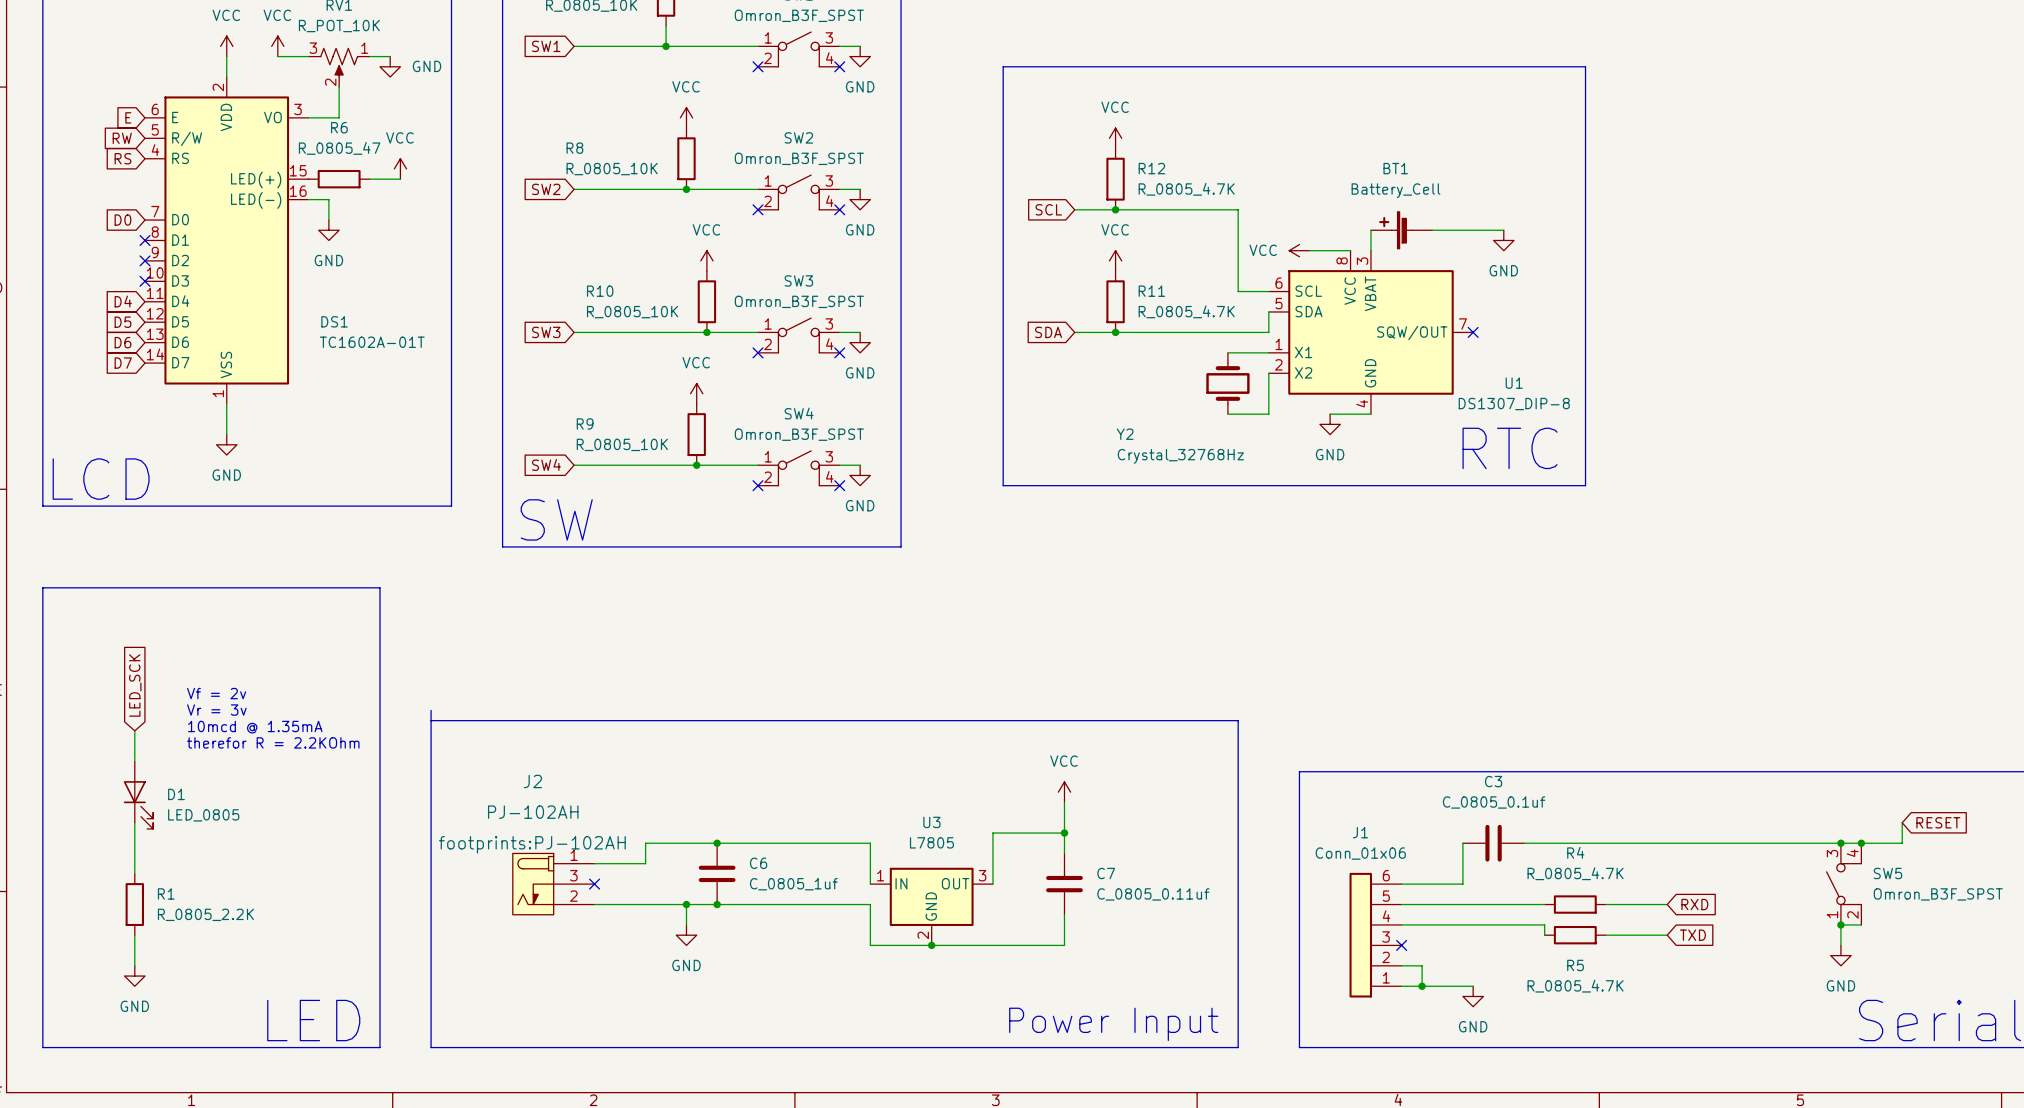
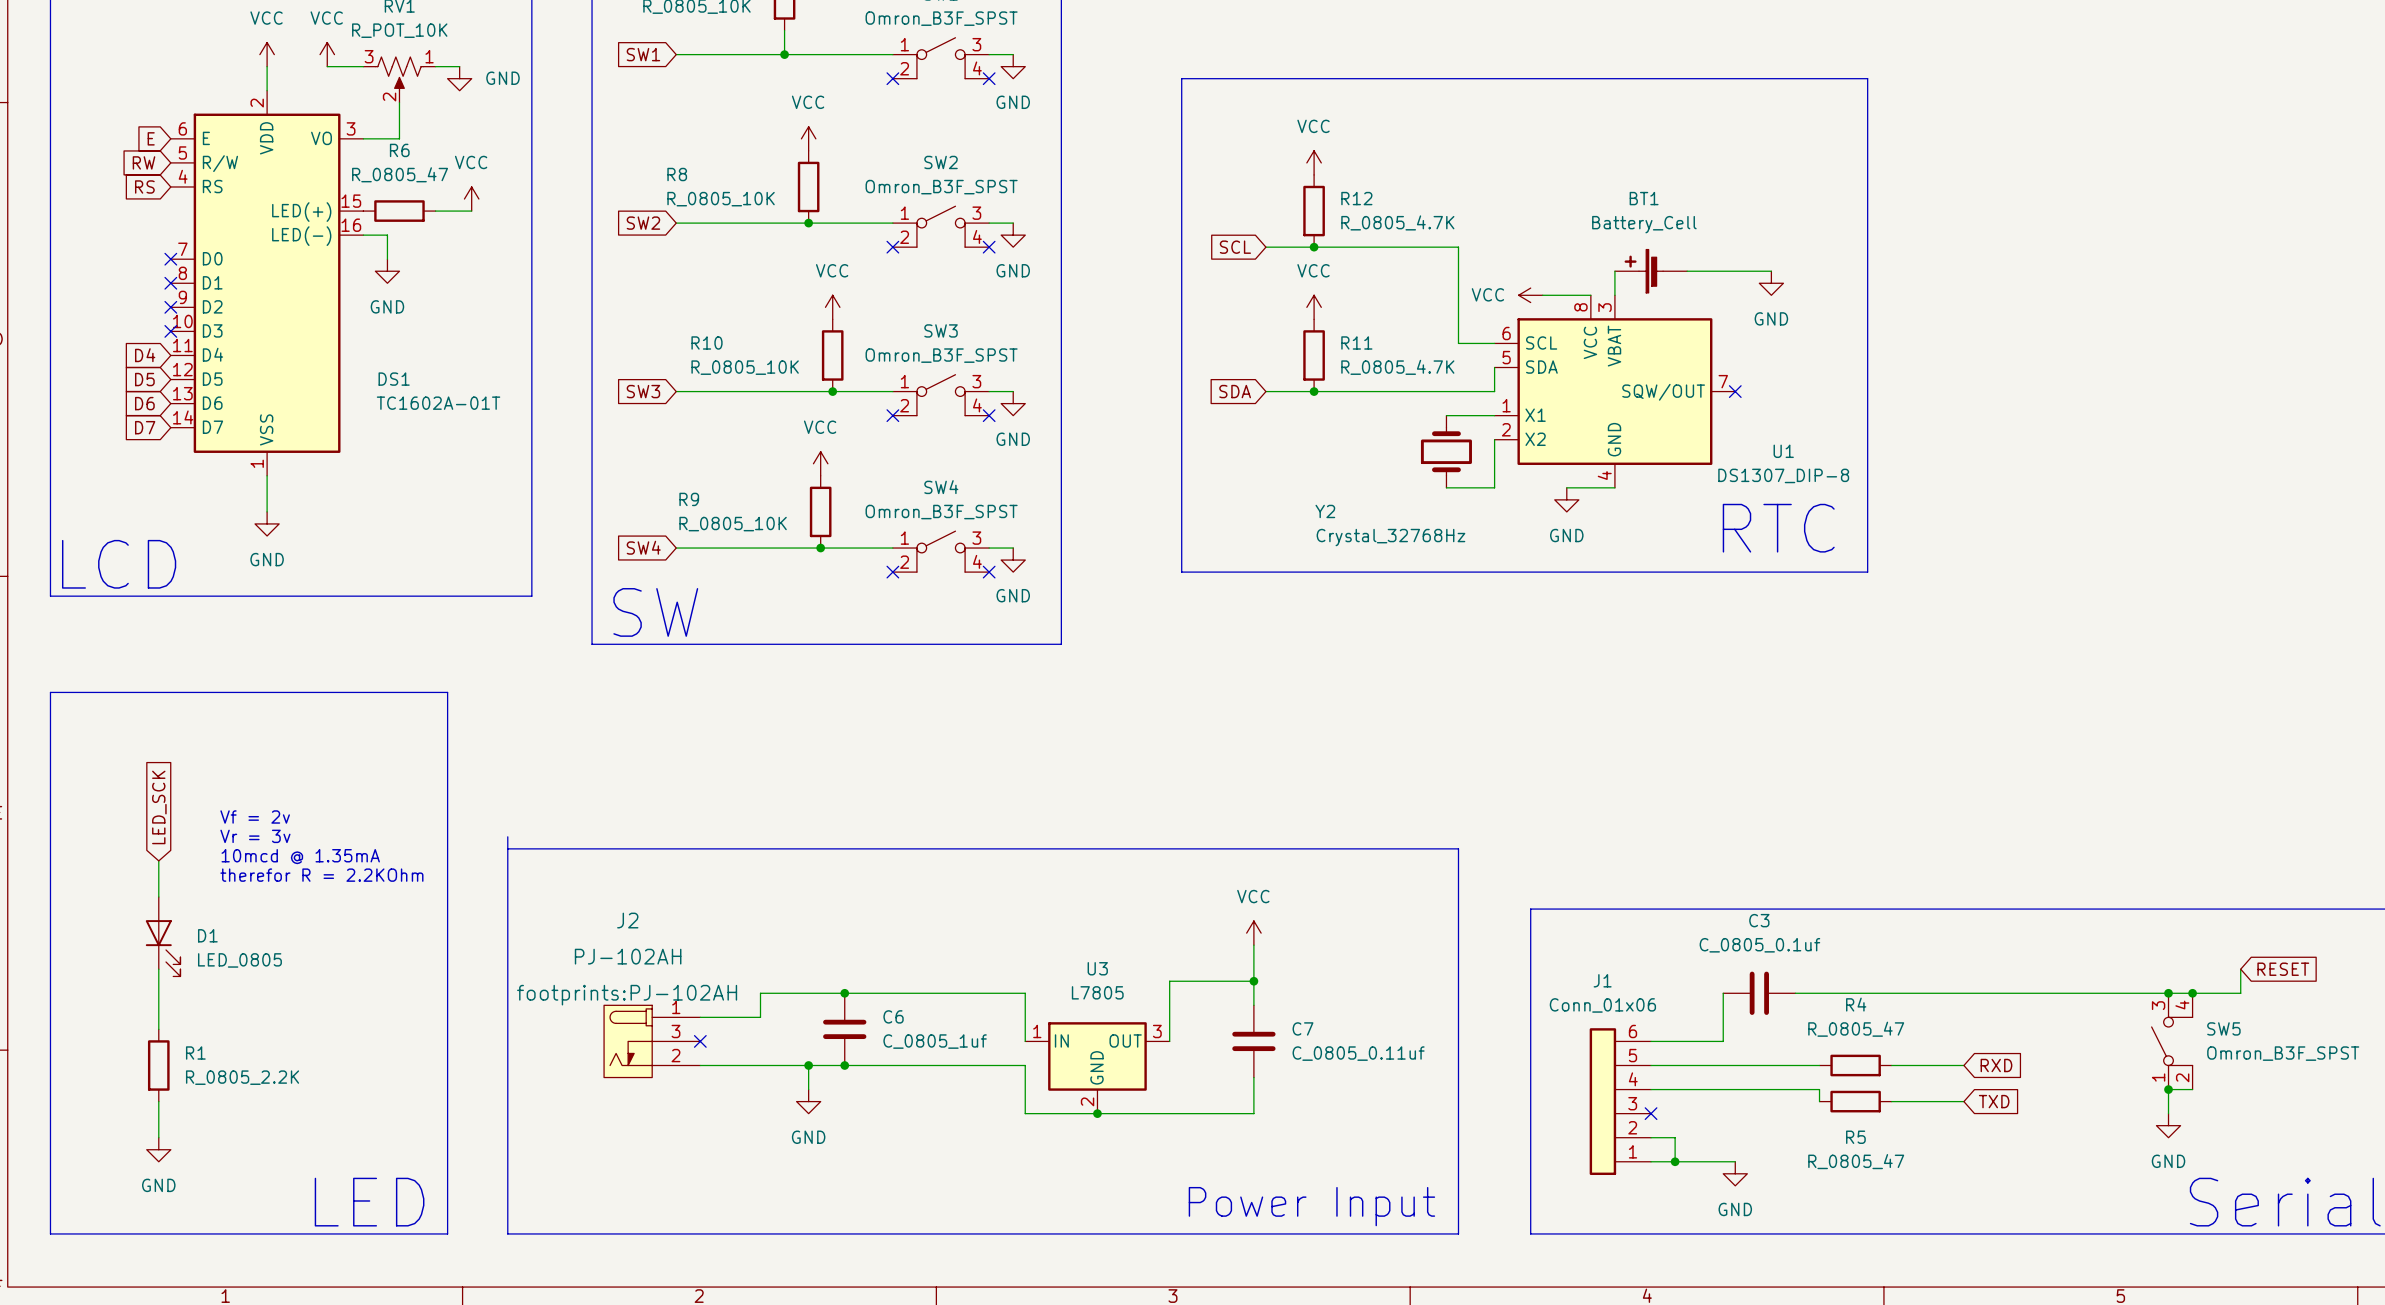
global label: D0 (122, 220) -> none
no-connect mark: none -> (170, 259)
R4 value: R_0805_4.7K (1575, 873) -> R_0805_47 (1856, 1029)
R5 value: R_0805_4.7K (1575, 986) -> R_0805_47 (1856, 1161)

